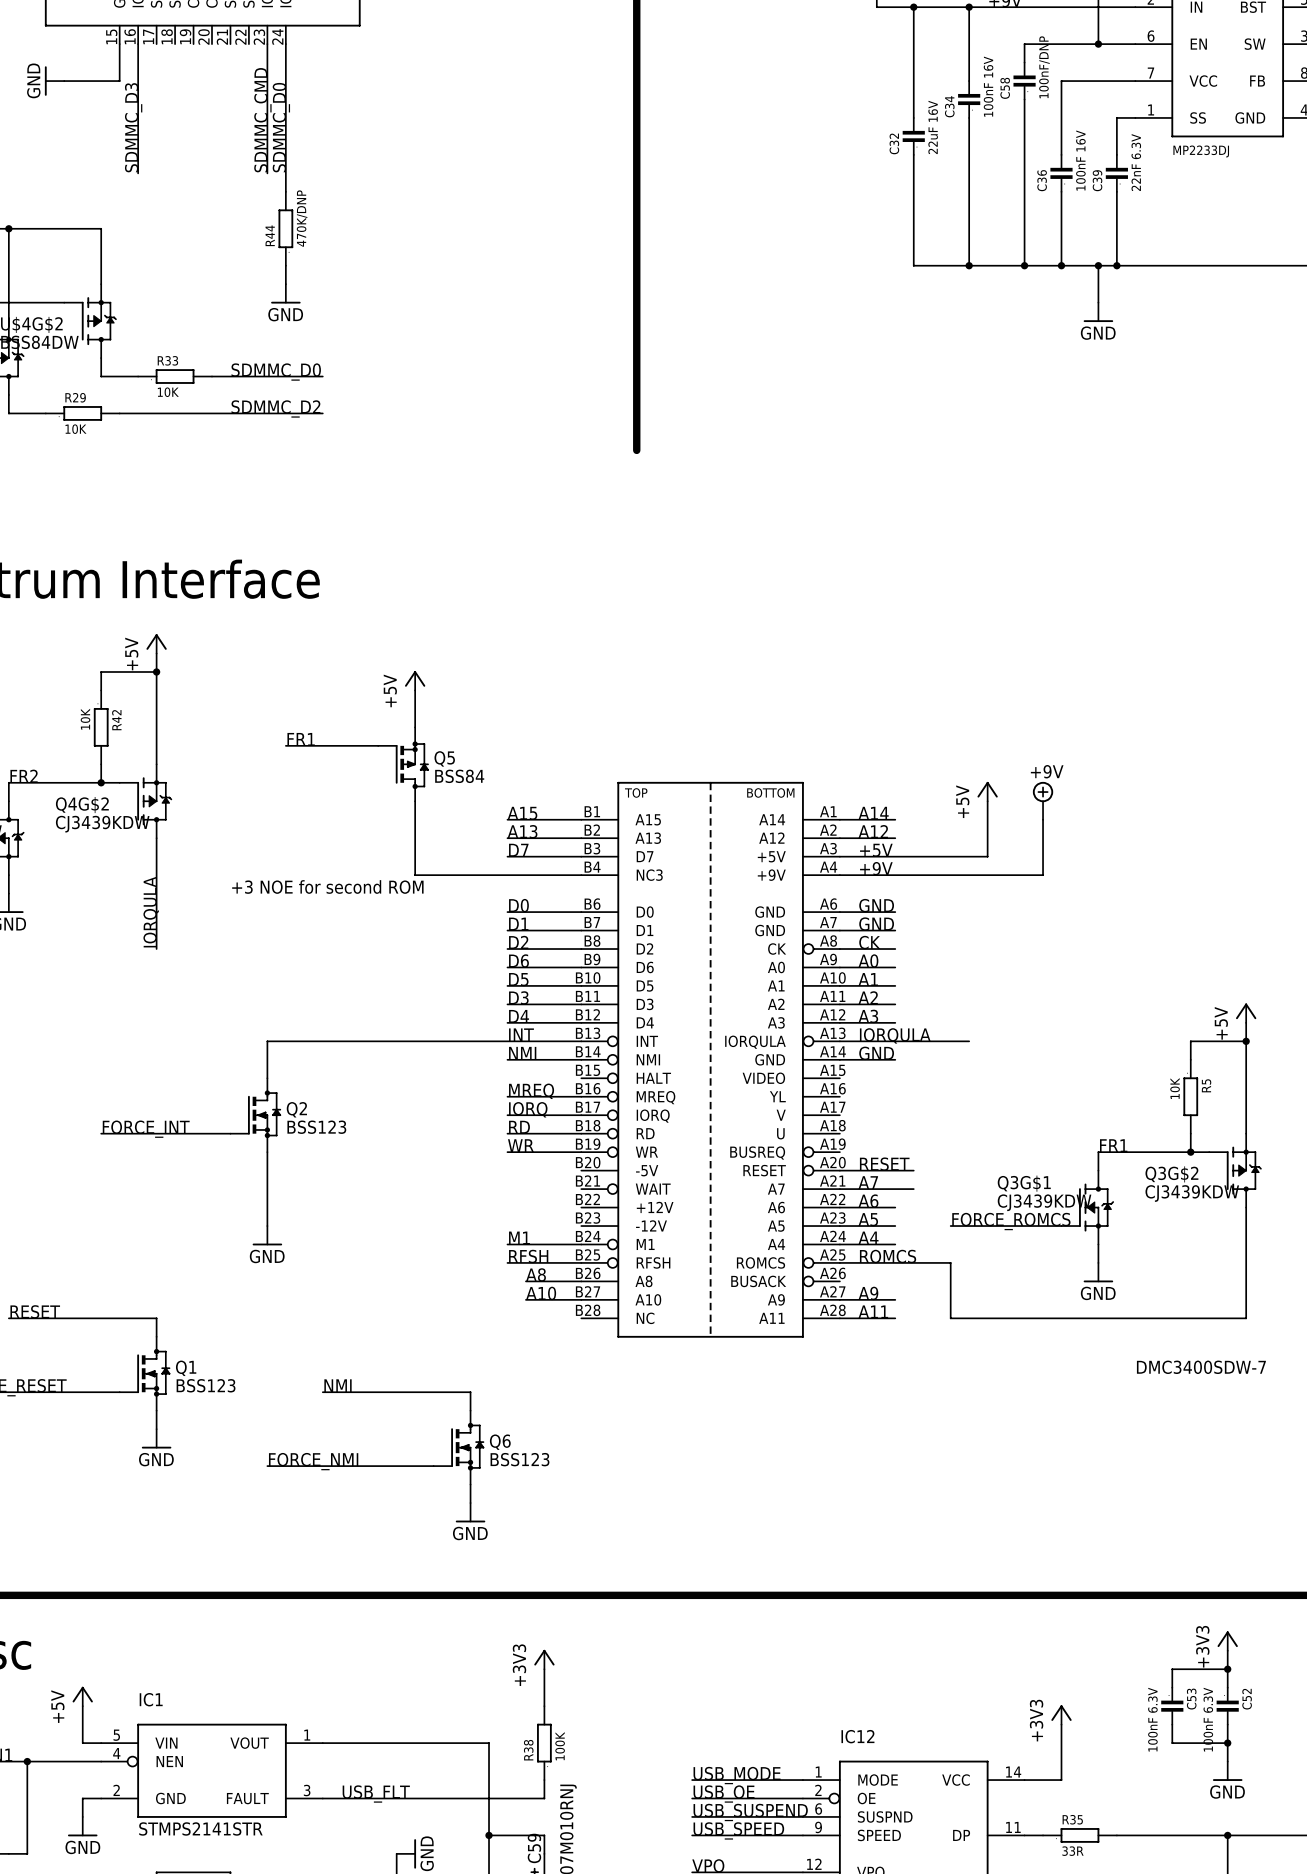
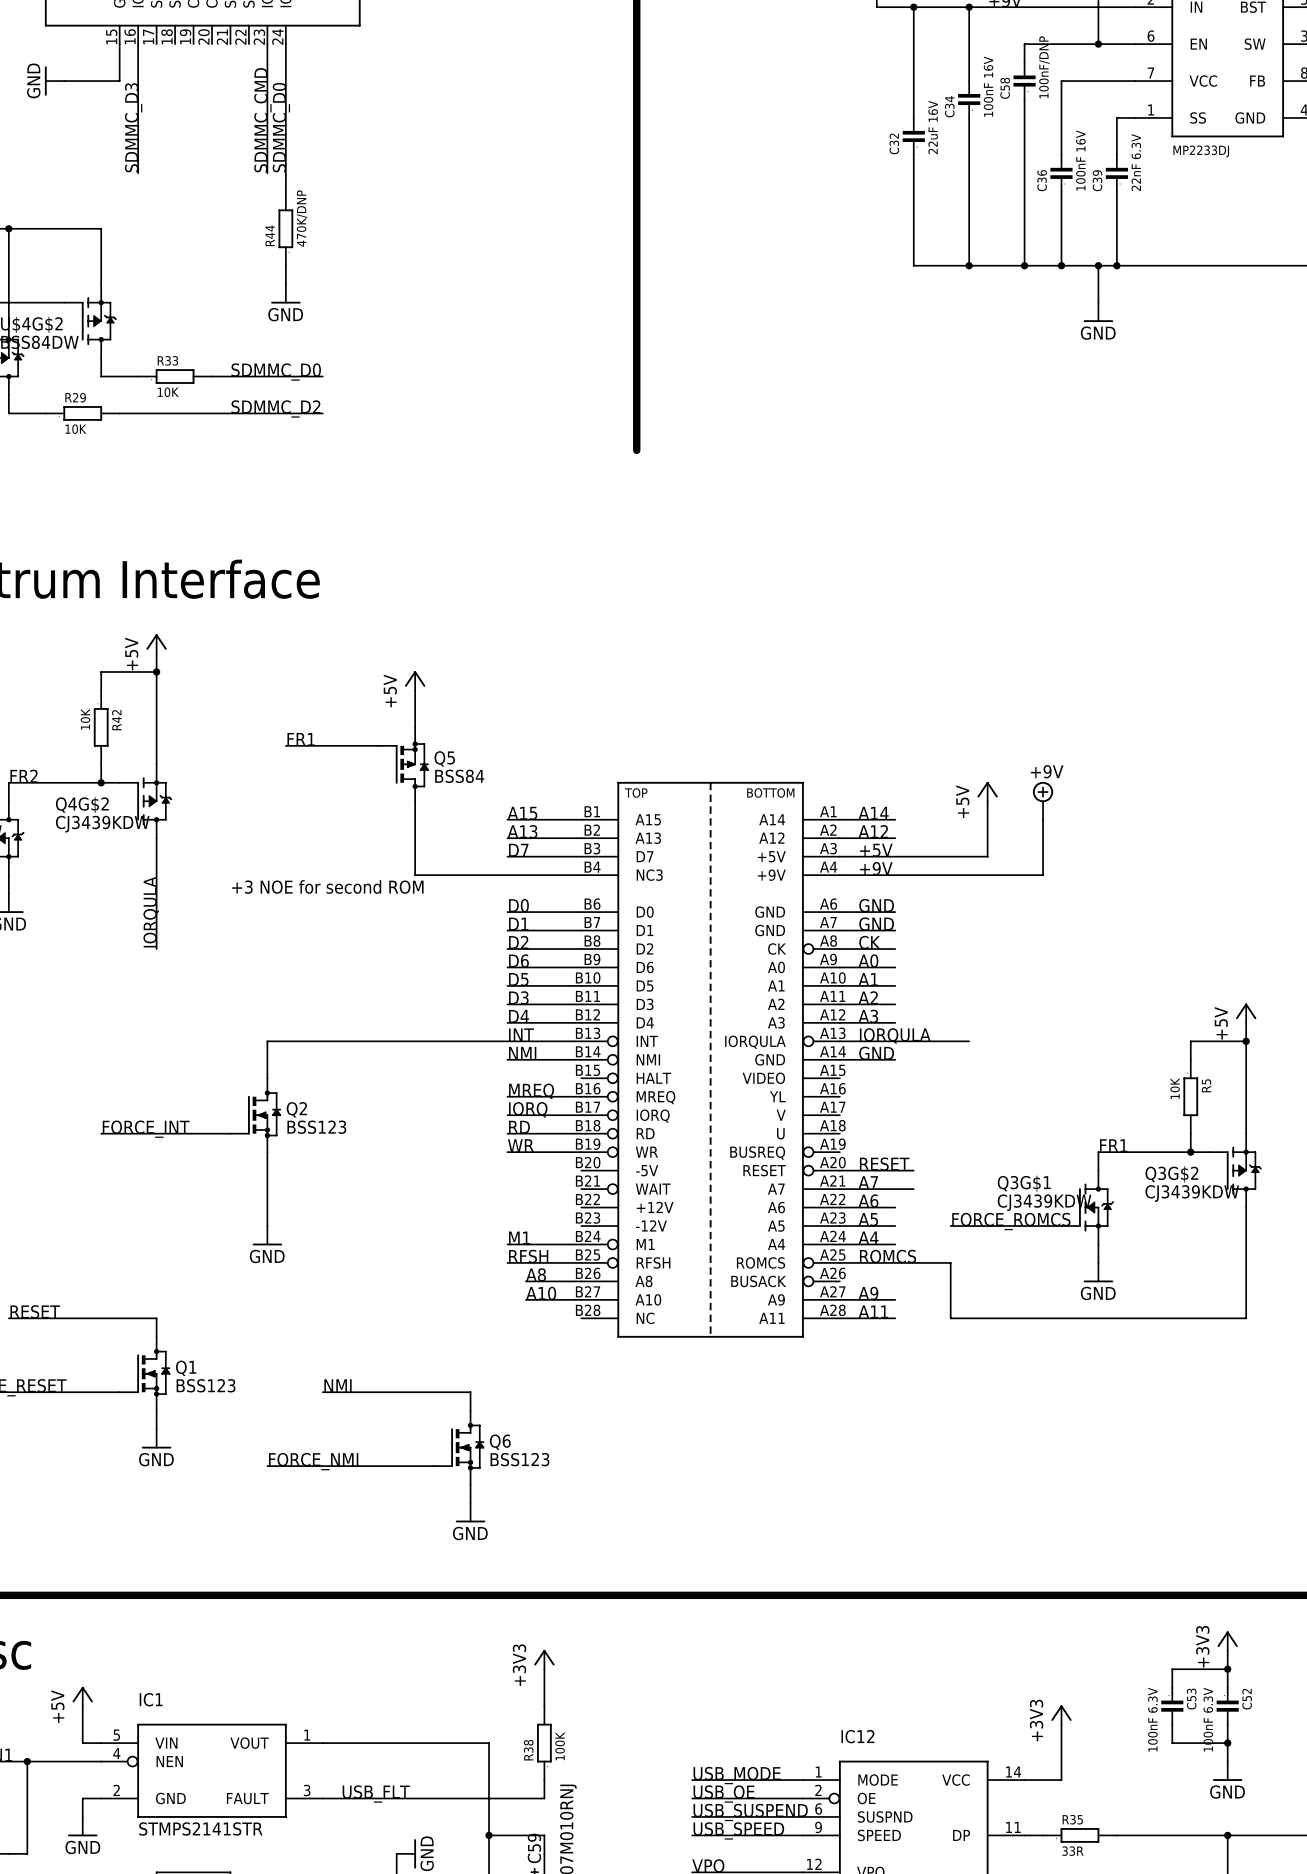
text: DMC3400SDW-7 (1201, 1367) -> none

